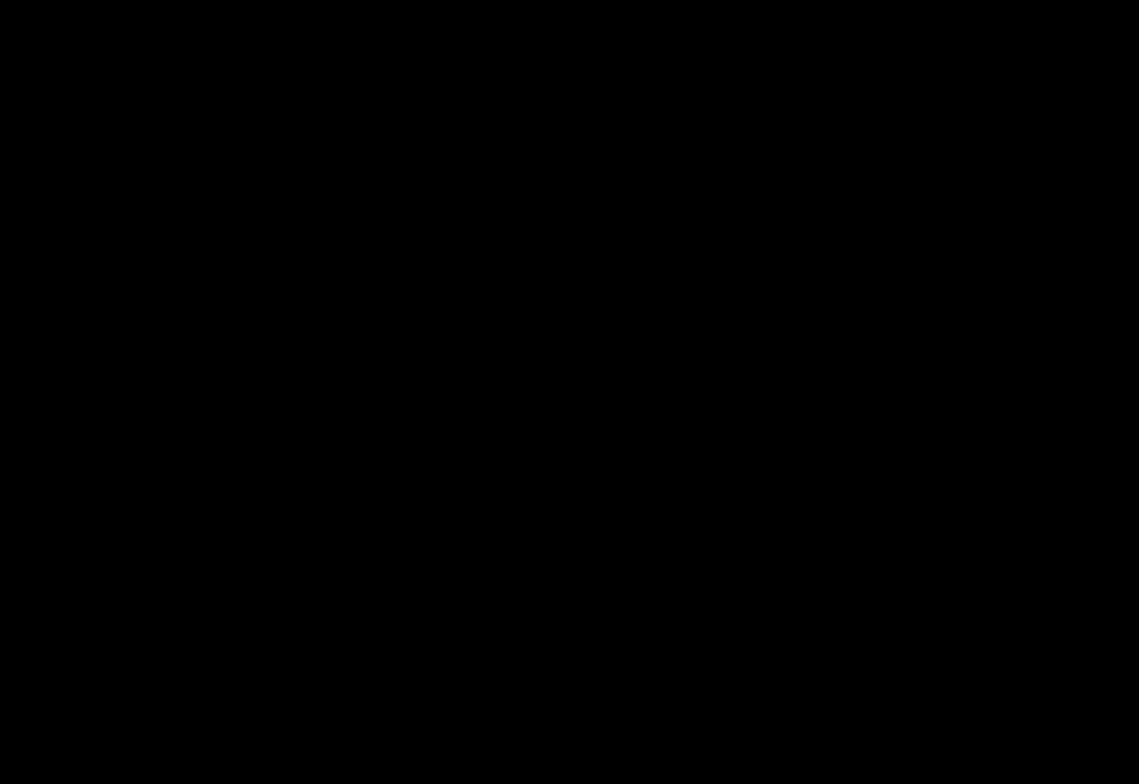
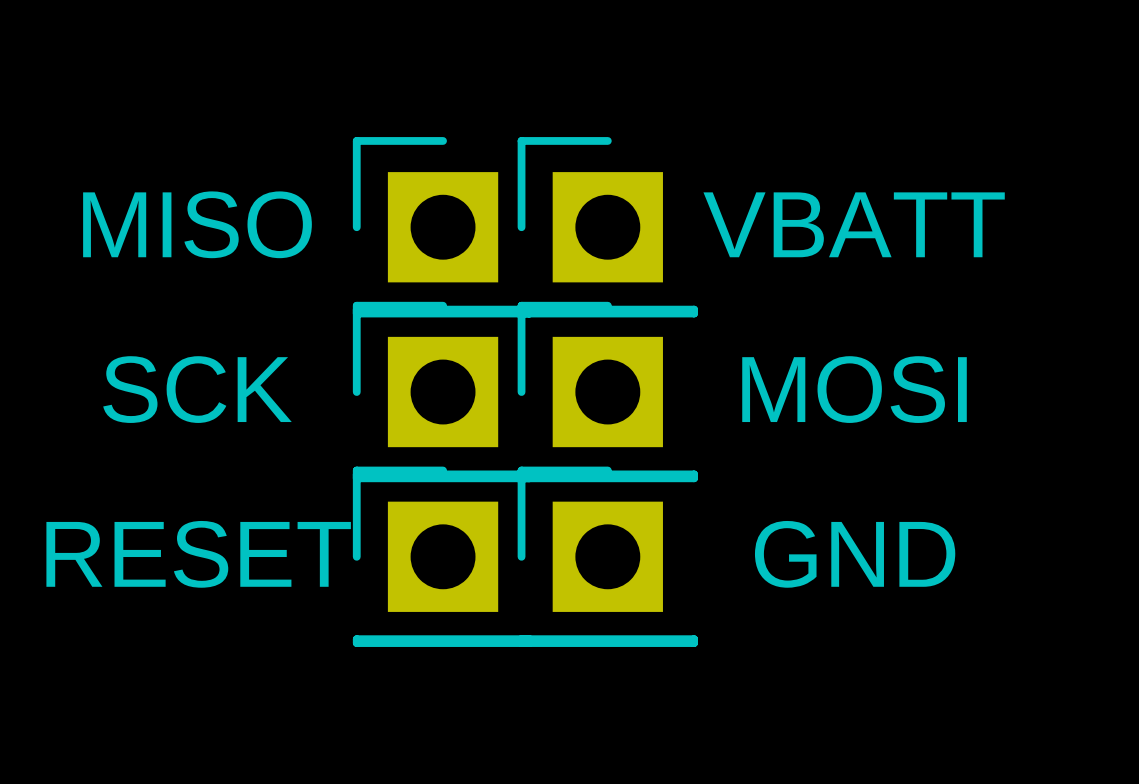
part: none -> MISO (443, 227)
part: none -> VBATT (607, 227)
part: none -> SCK (443, 392)
part: none -> MOSI (607, 392)
part: none -> RESET (443, 556)
part: none -> GND (607, 556)

